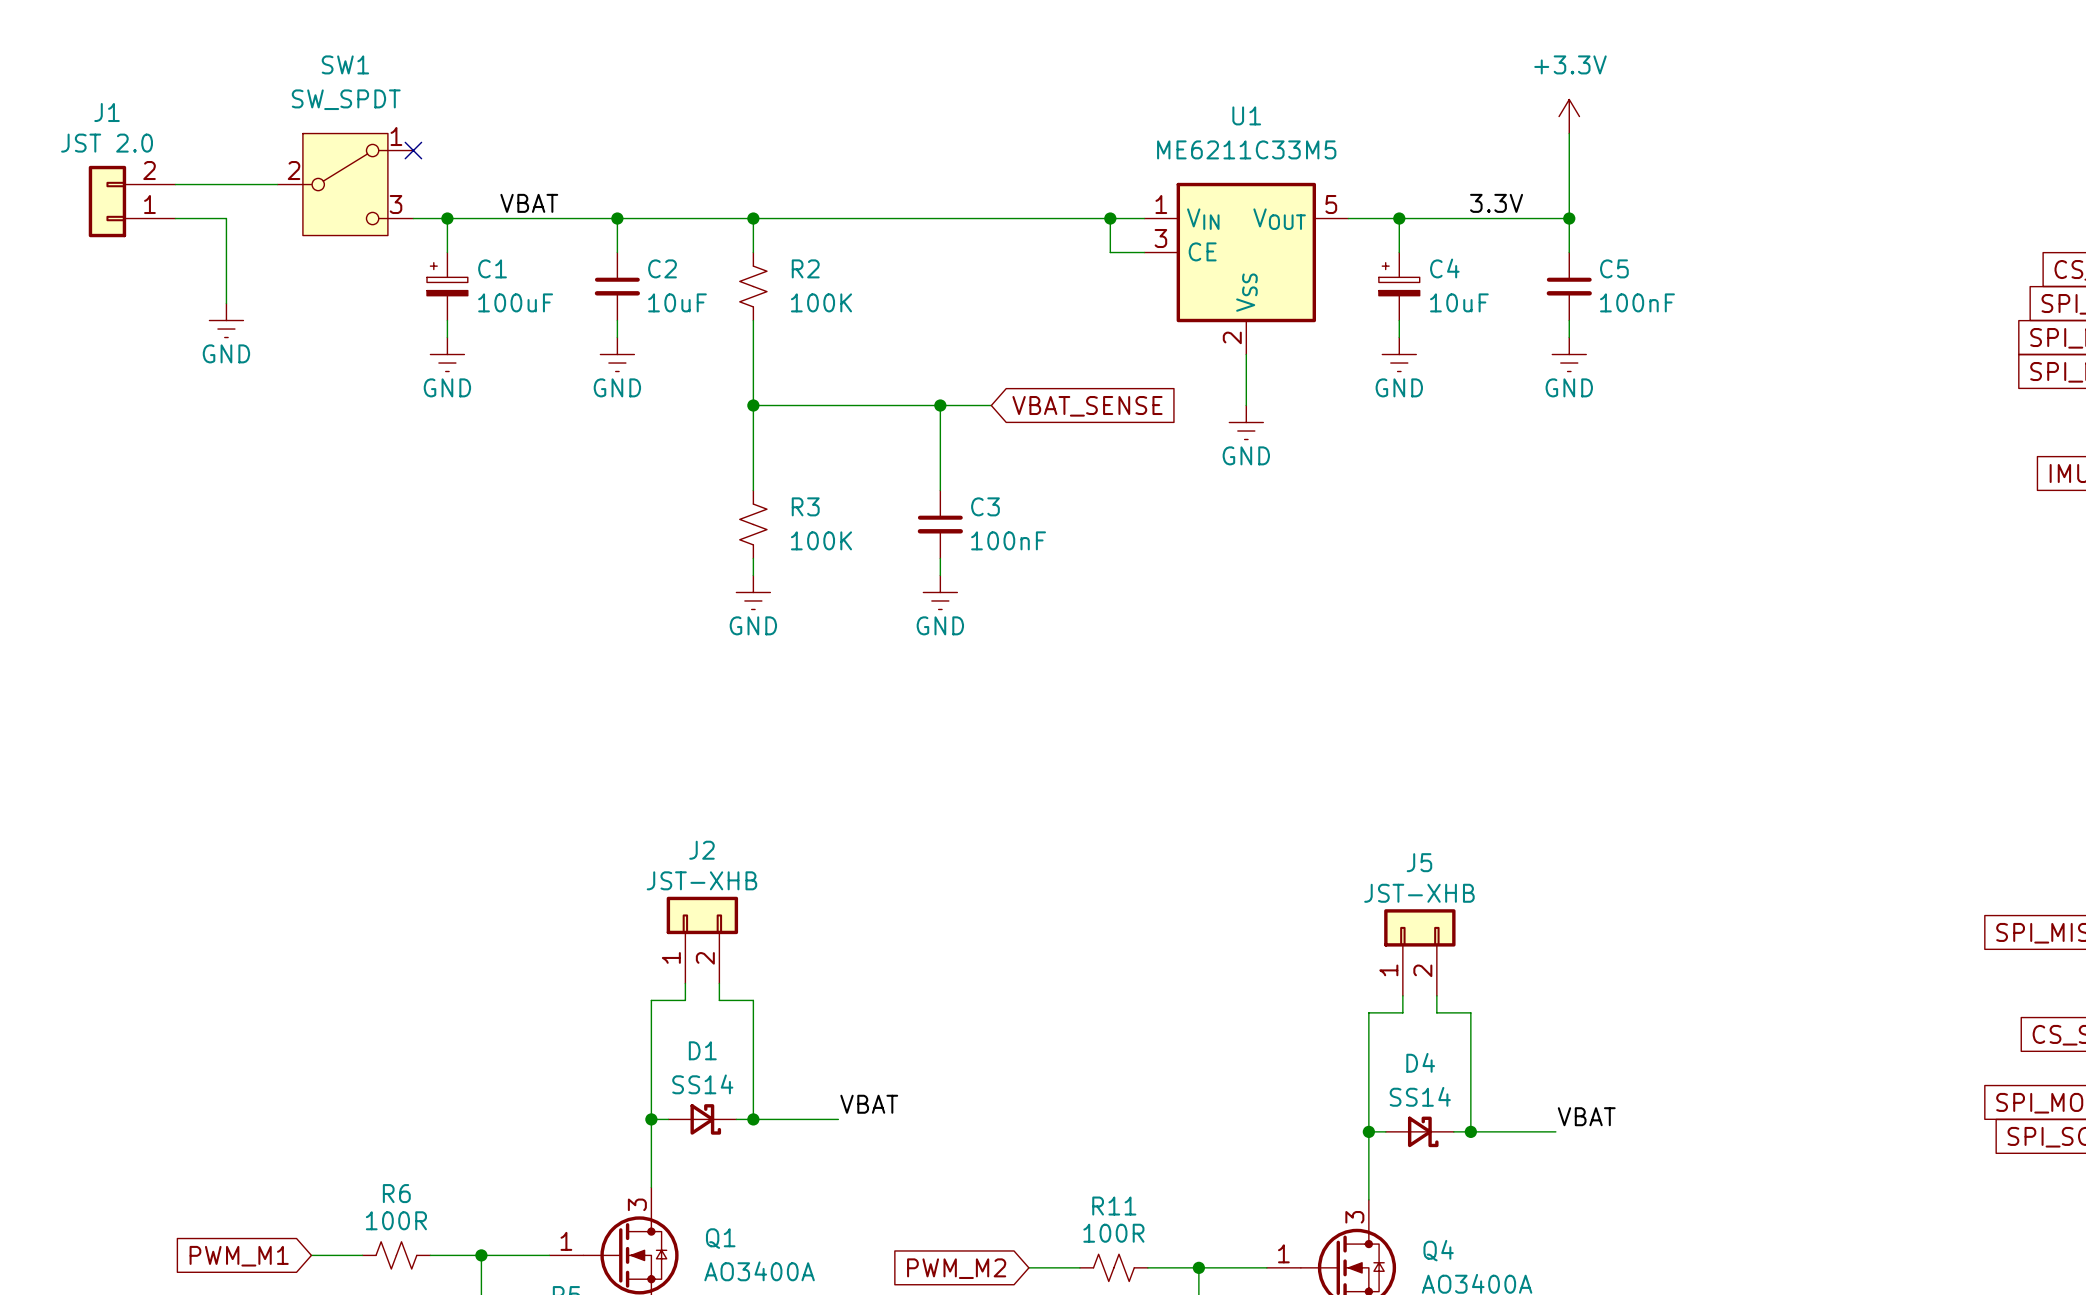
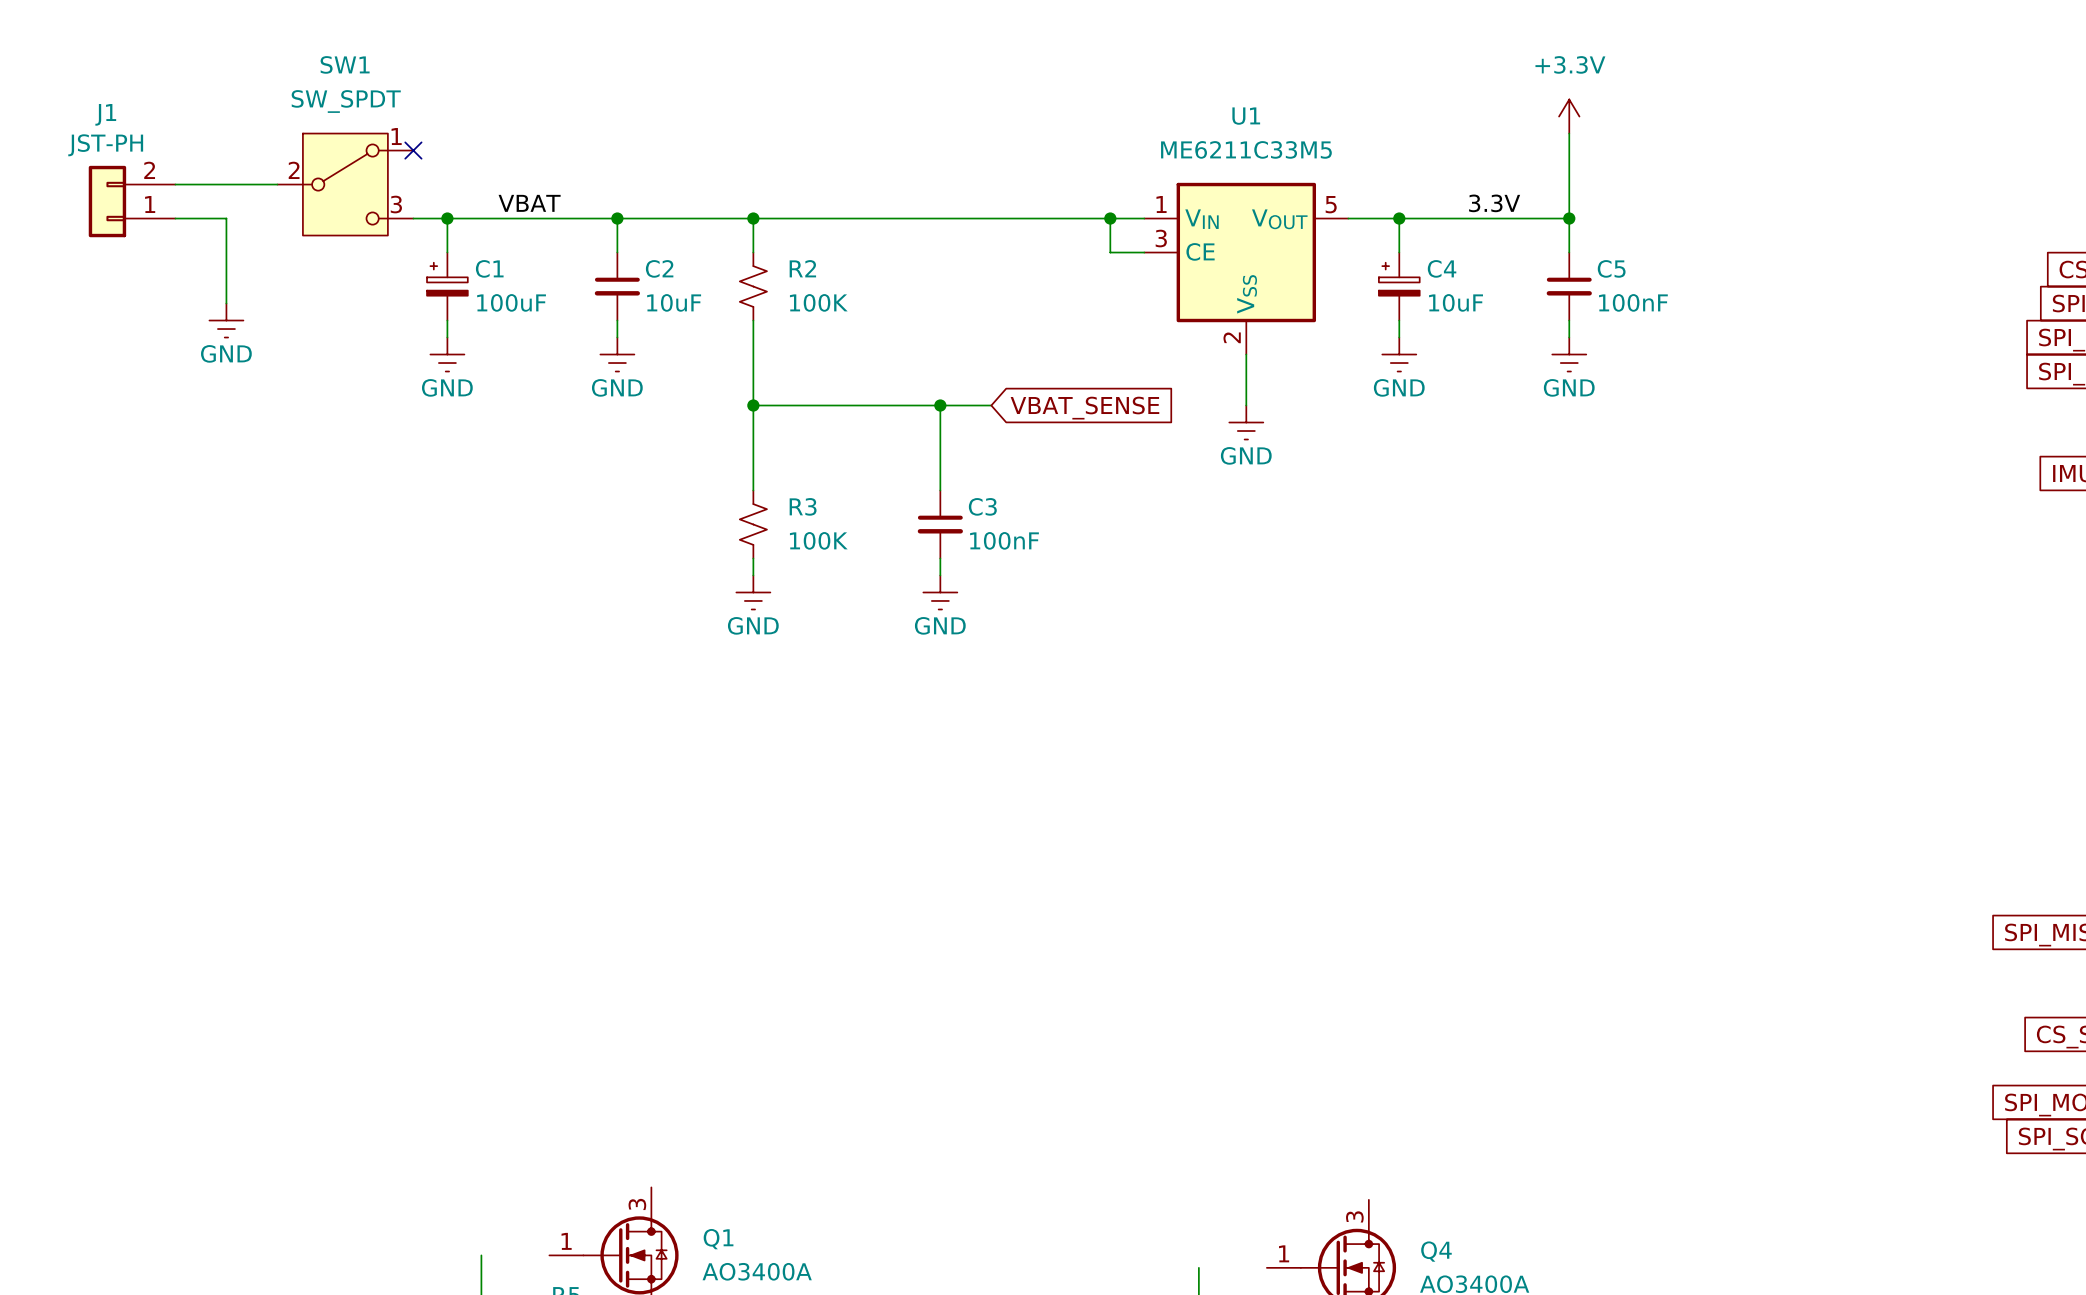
J1 value: JST 2.0 (107, 143) -> JST-PH (105, 145)
J2: JST-XHB (702, 940) -> none
J5: JST-XHB (1419, 952) -> none
wire: (685, 983) (685, 1000) (651, 1000) (651, 1187) -> none
wire: (719, 983) (719, 1000) (753, 1000) (753, 1119) -> none
wire: (1402, 995) (1402, 1012) (1368, 1012) (1368, 1199) -> none
wire: (1436, 995) (1436, 1012) (1470, 1012) (1470, 1131) -> none
label: VBAT (869, 1104) -> none
label: VBAT (1586, 1116) -> none
wire: (651, 1119) (668, 1119) -> none
junction: (651, 1119) -> none
D1: SS14 (702, 1119) -> none
wire: (736, 1119) (838, 1119) -> none
junction: (753, 1119) -> none
wire: (1368, 1131) (1385, 1131) -> none
junction: (1368, 1131) -> none
D4: SS14 (1419, 1131) -> none
wire: (1453, 1131) (1555, 1131) -> none
junction: (1470, 1131) -> none
wire: (311, 1255) (362, 1255) -> none
R6: 100R (396, 1255) -> none
wire: (430, 1255) (549, 1255) -> none
junction: (481, 1255) -> none
global label: PWM_M1 (239, 1256) -> none
wire: (1028, 1267) (1079, 1267) -> none
R11: 100R (1113, 1267) -> none
wire: (1147, 1267) (1266, 1267) -> none
junction: (1198, 1267) -> none
global label: PWM_M2 (956, 1268) -> none

